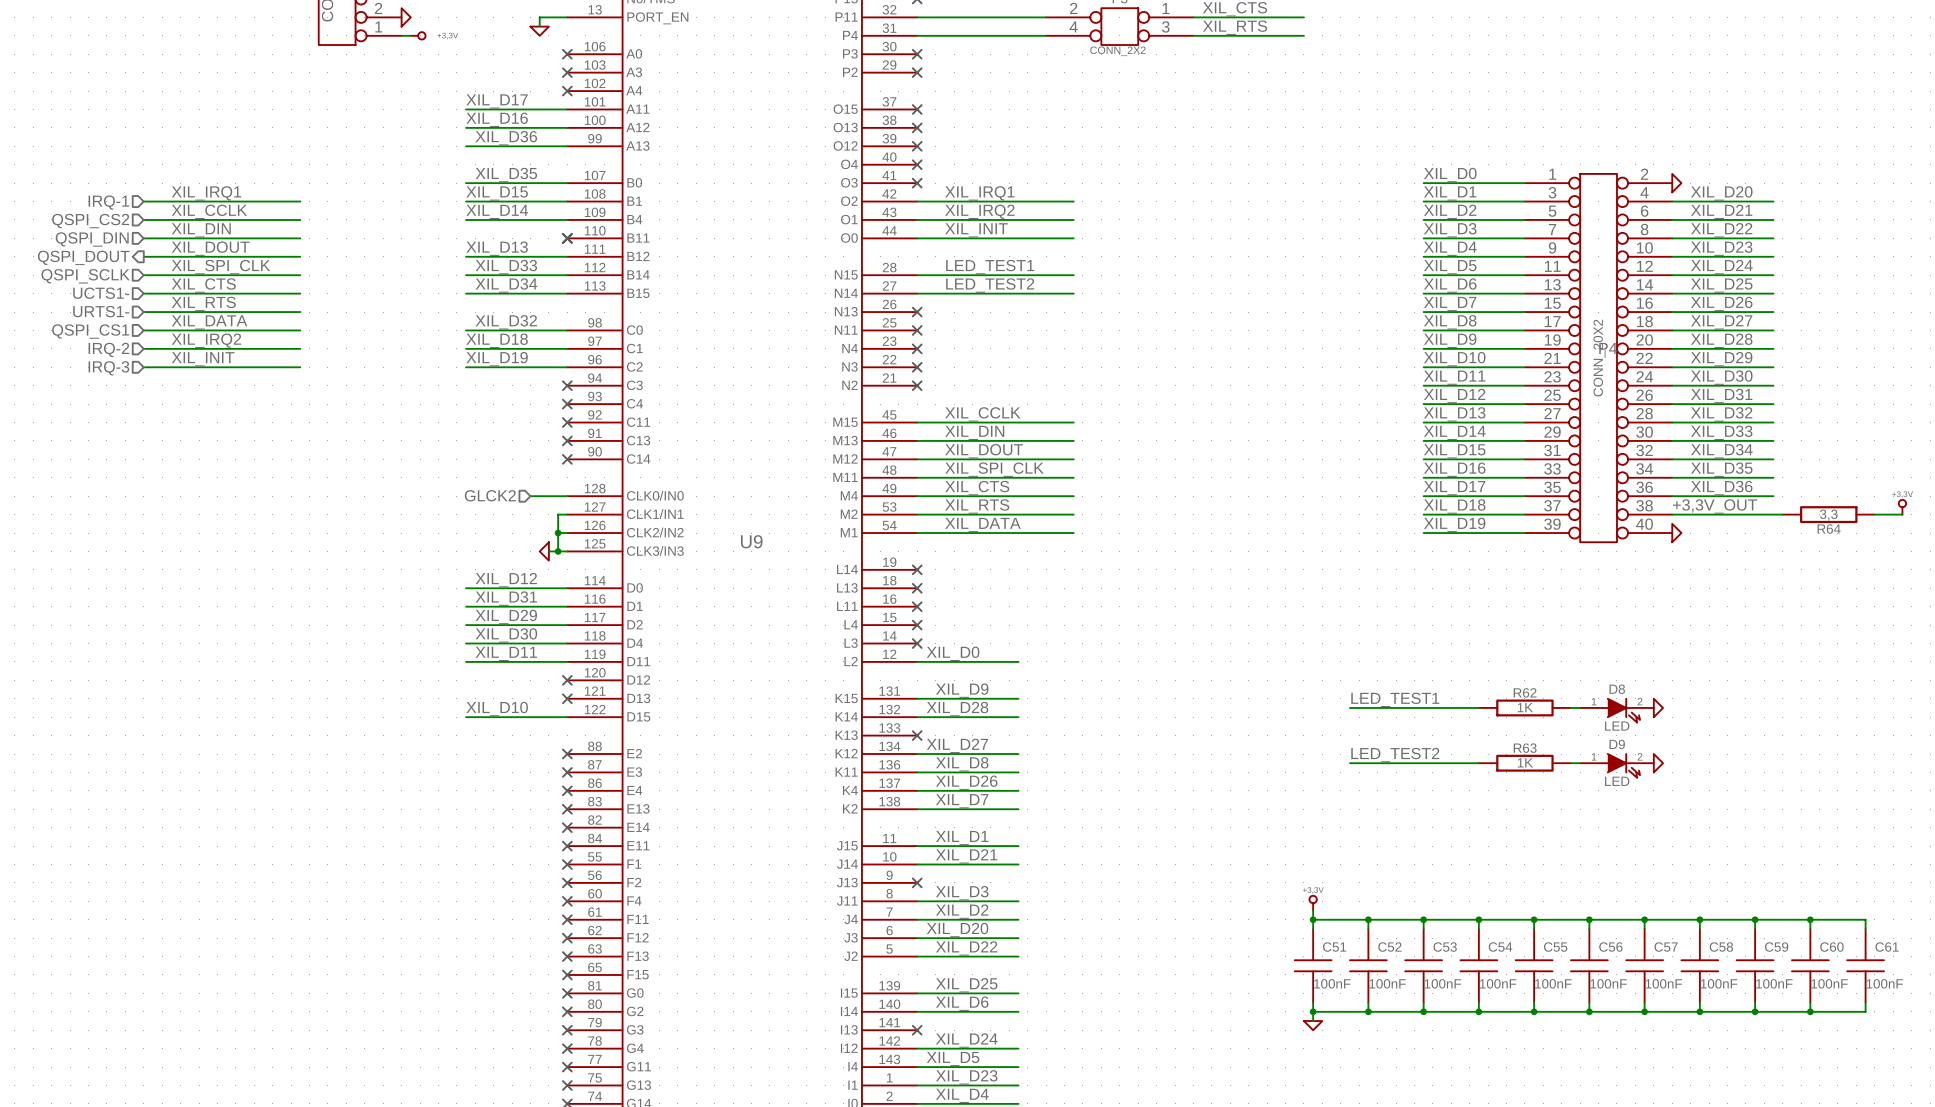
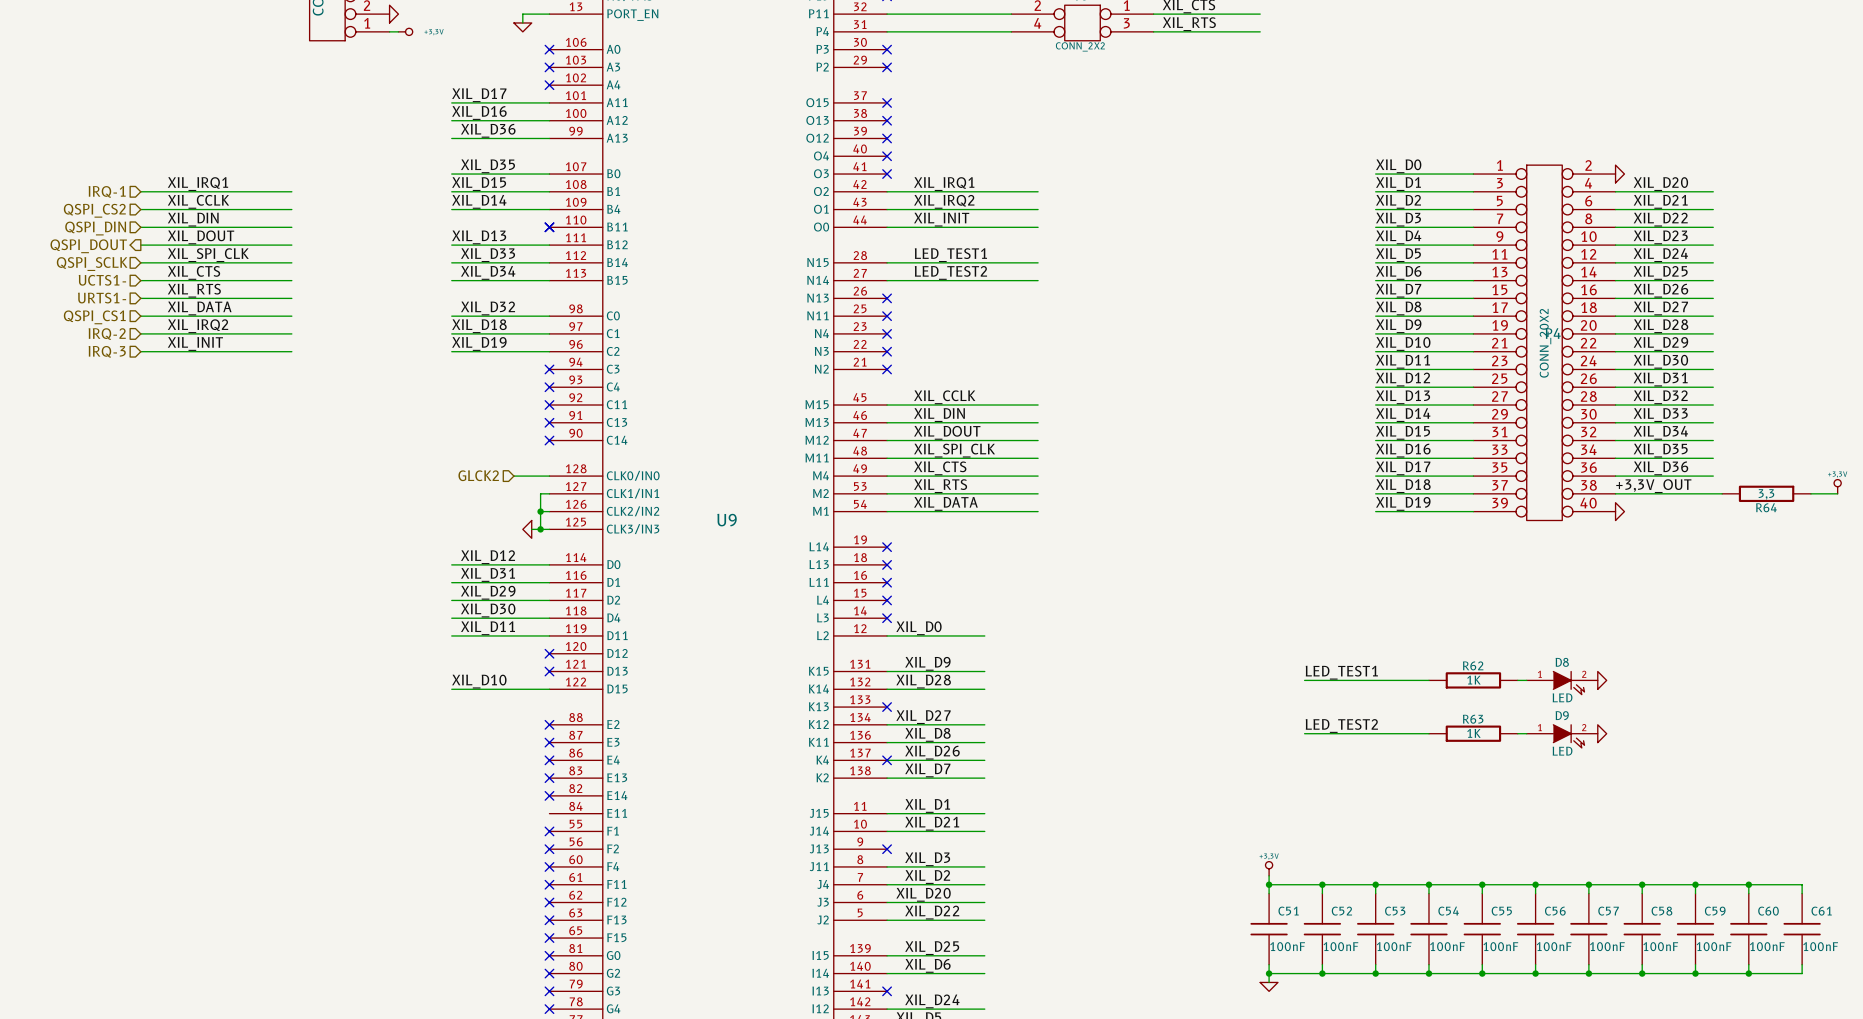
no-connect mark: none -> (887, 760)
no-connect mark: (567, 846) -> none

